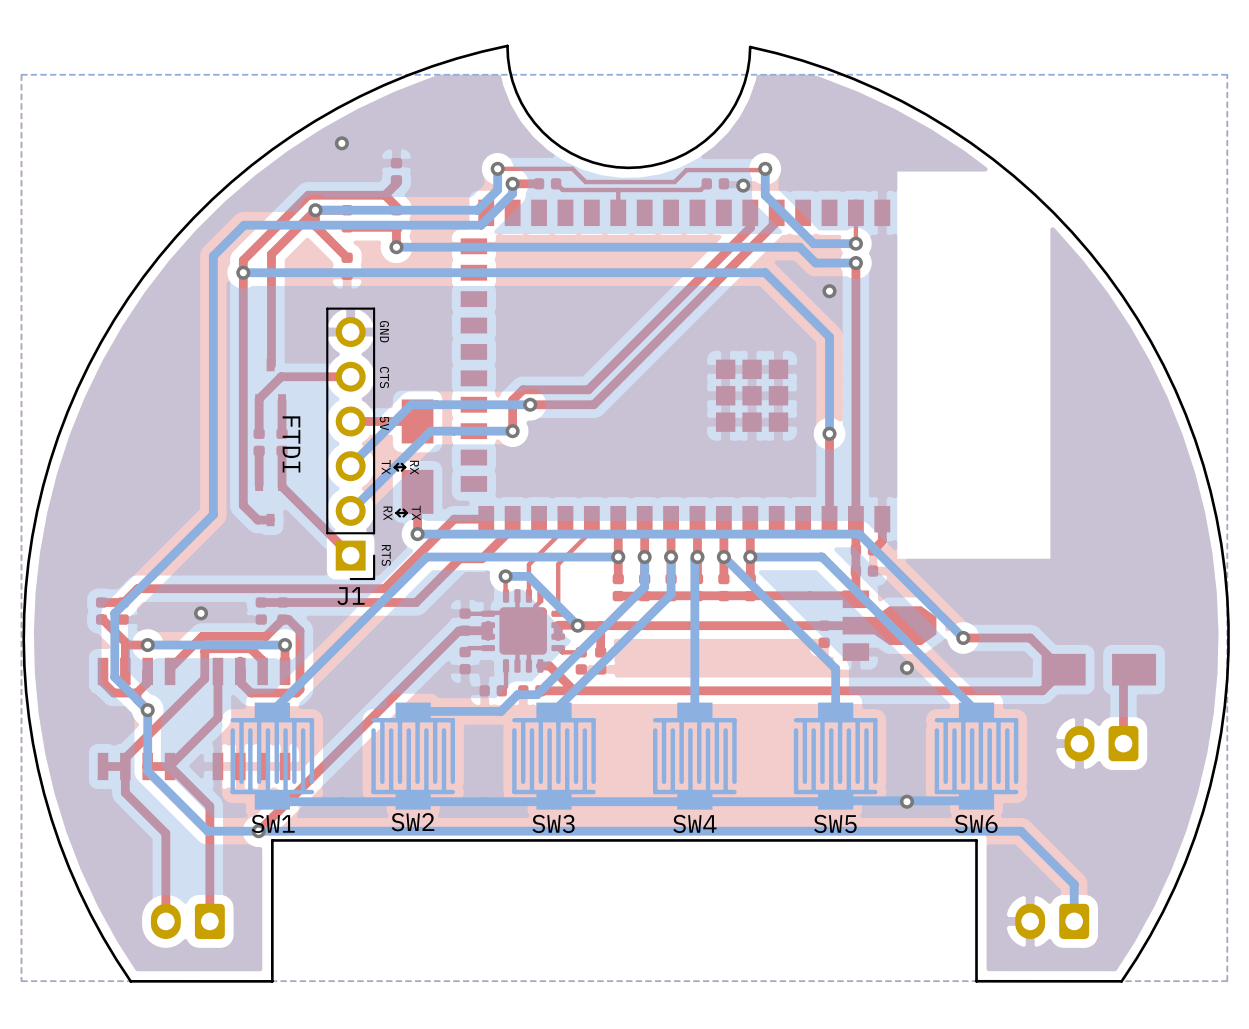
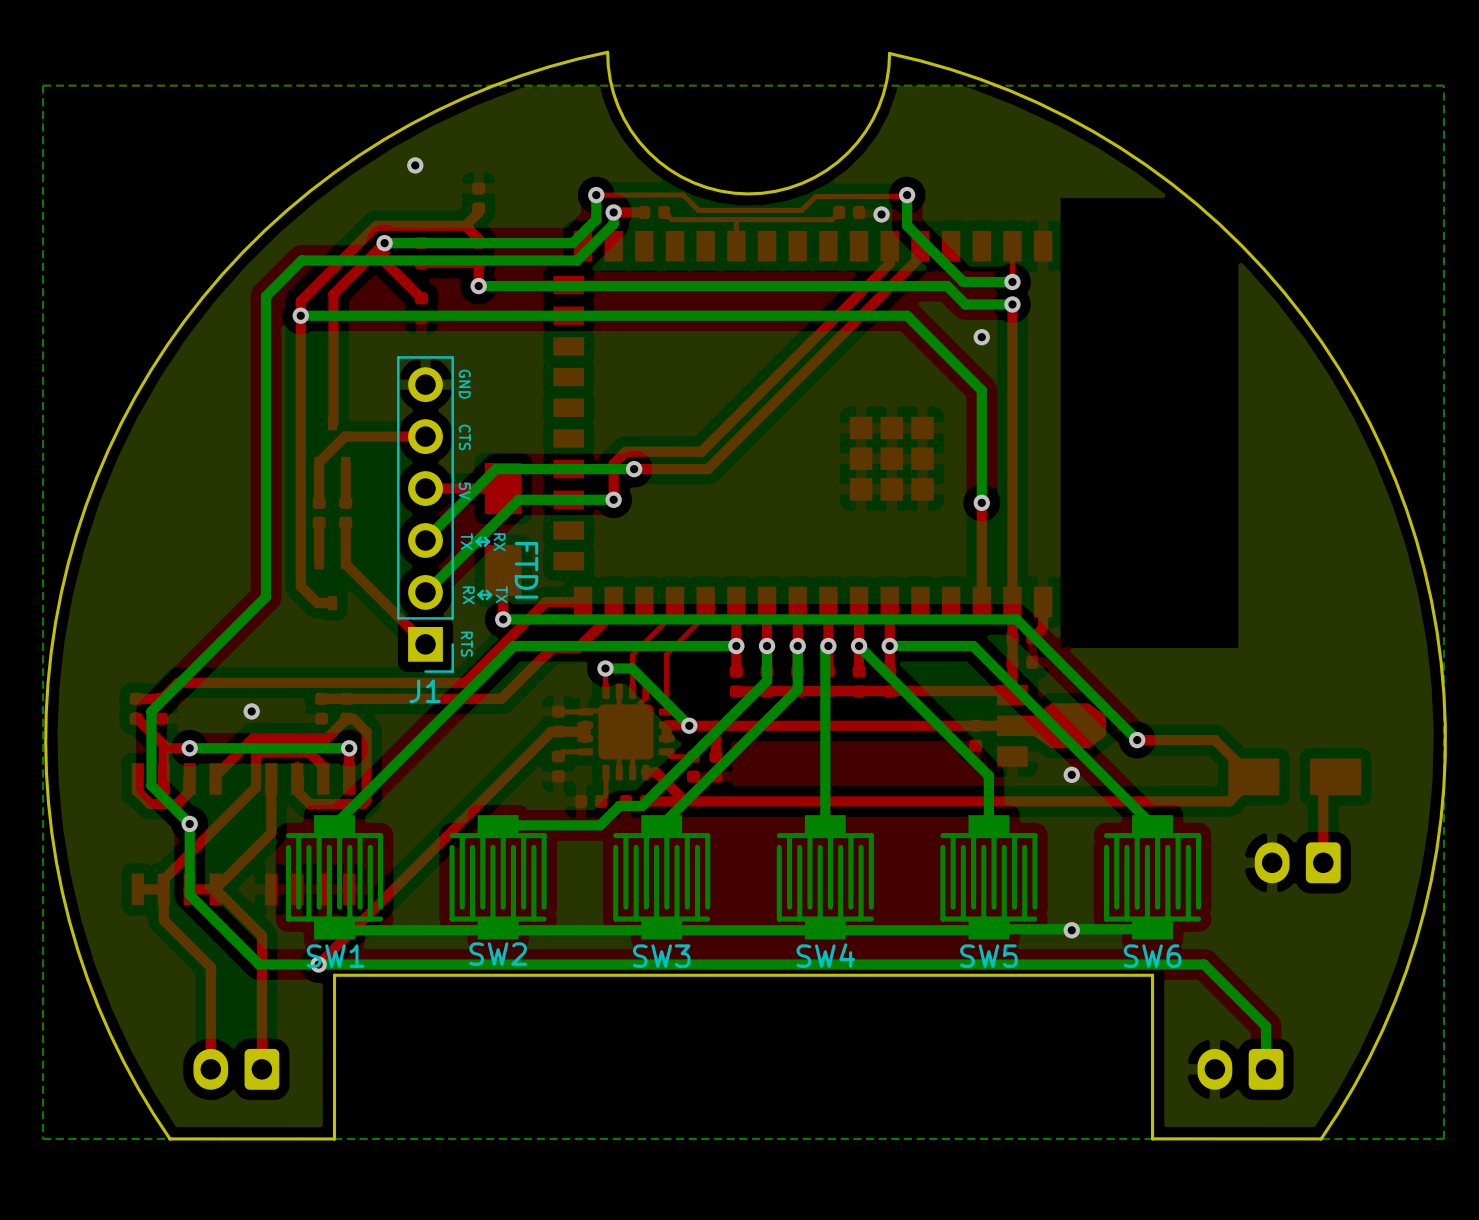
text position: FTDI (291, 444) -> FTDI (526, 570)

